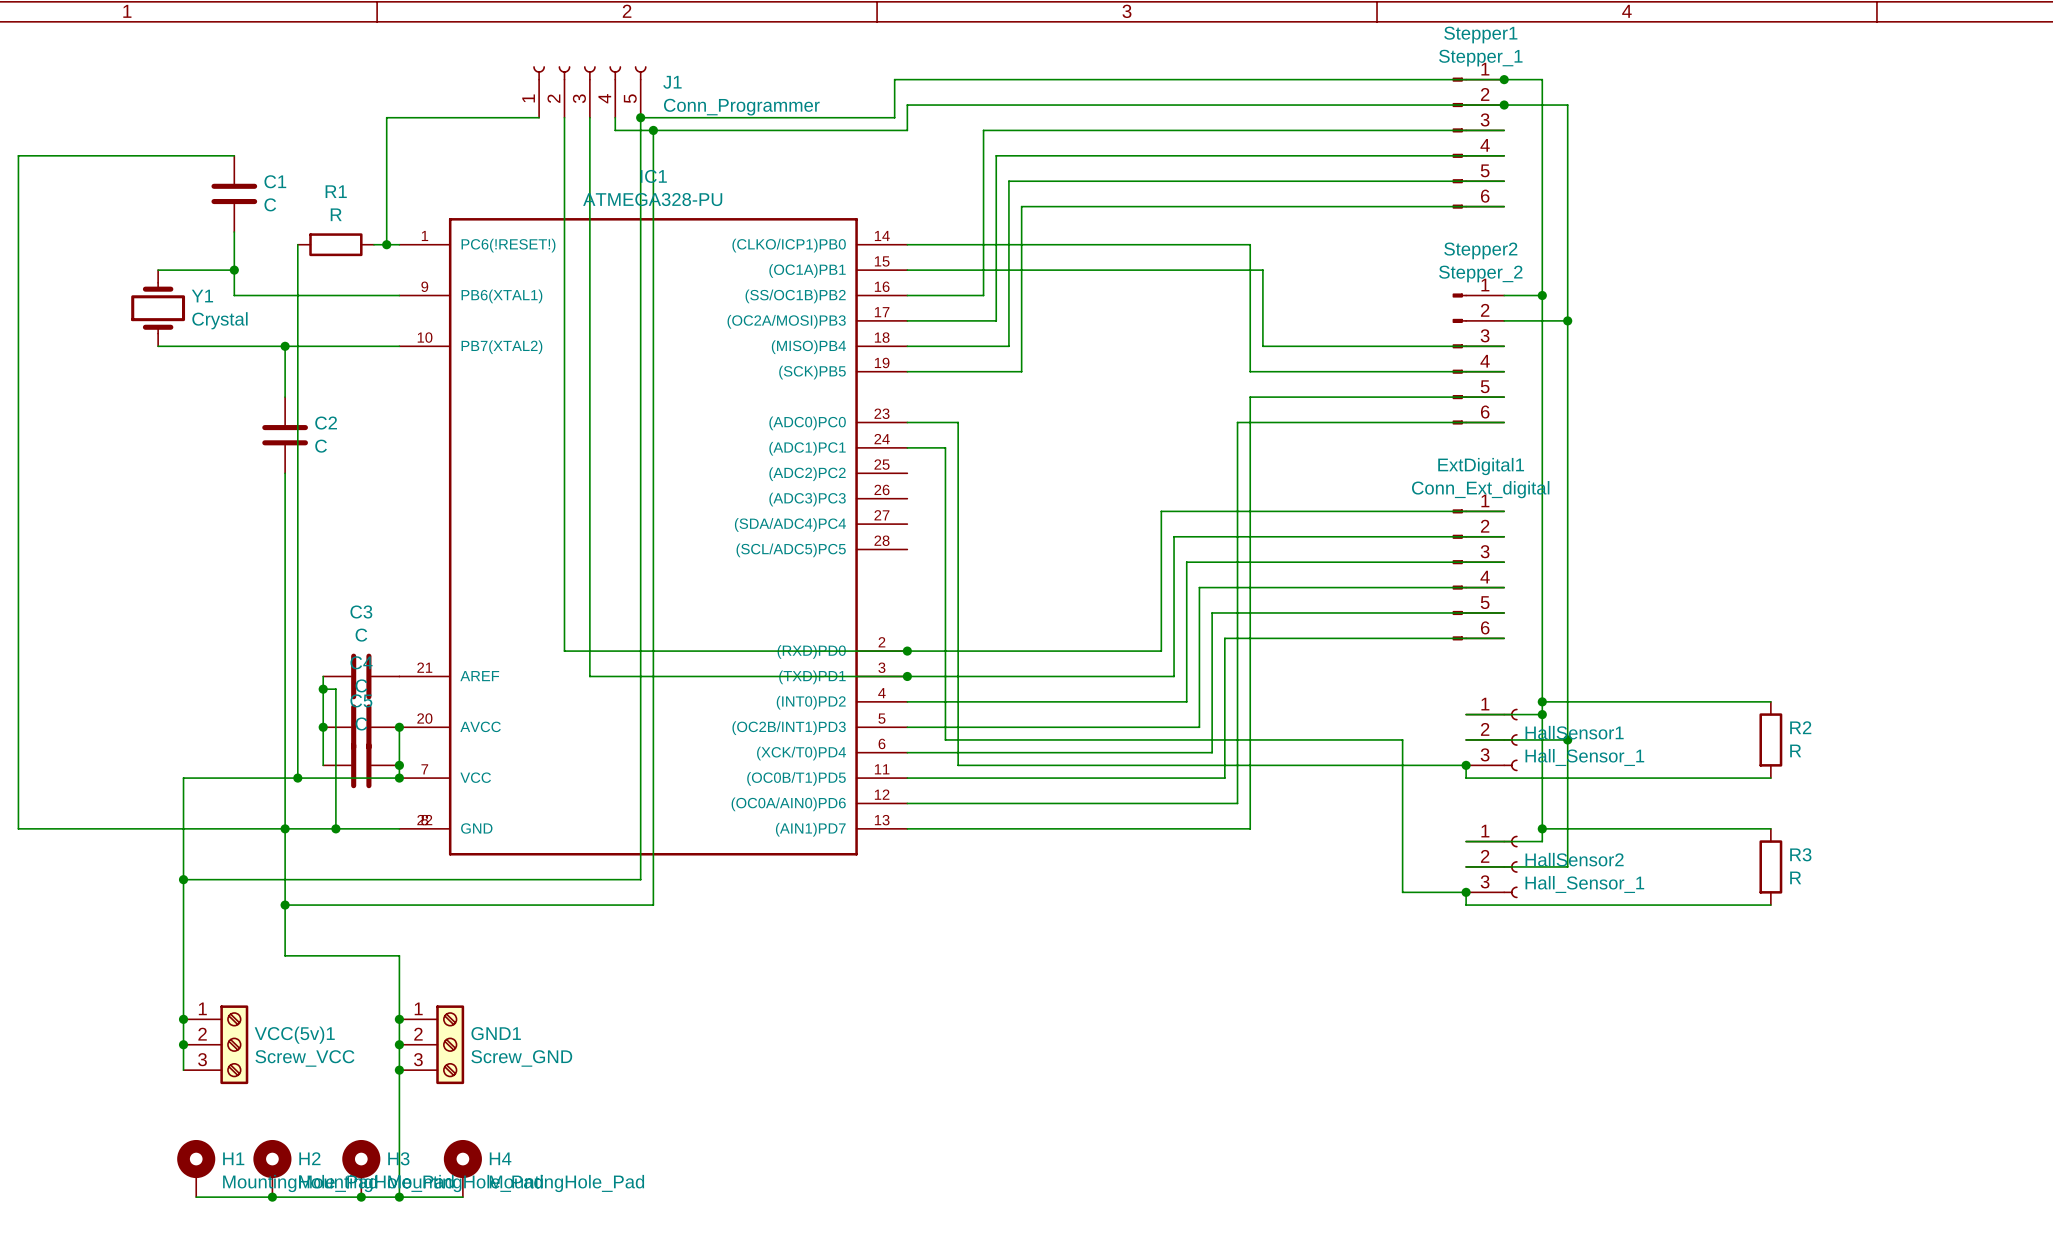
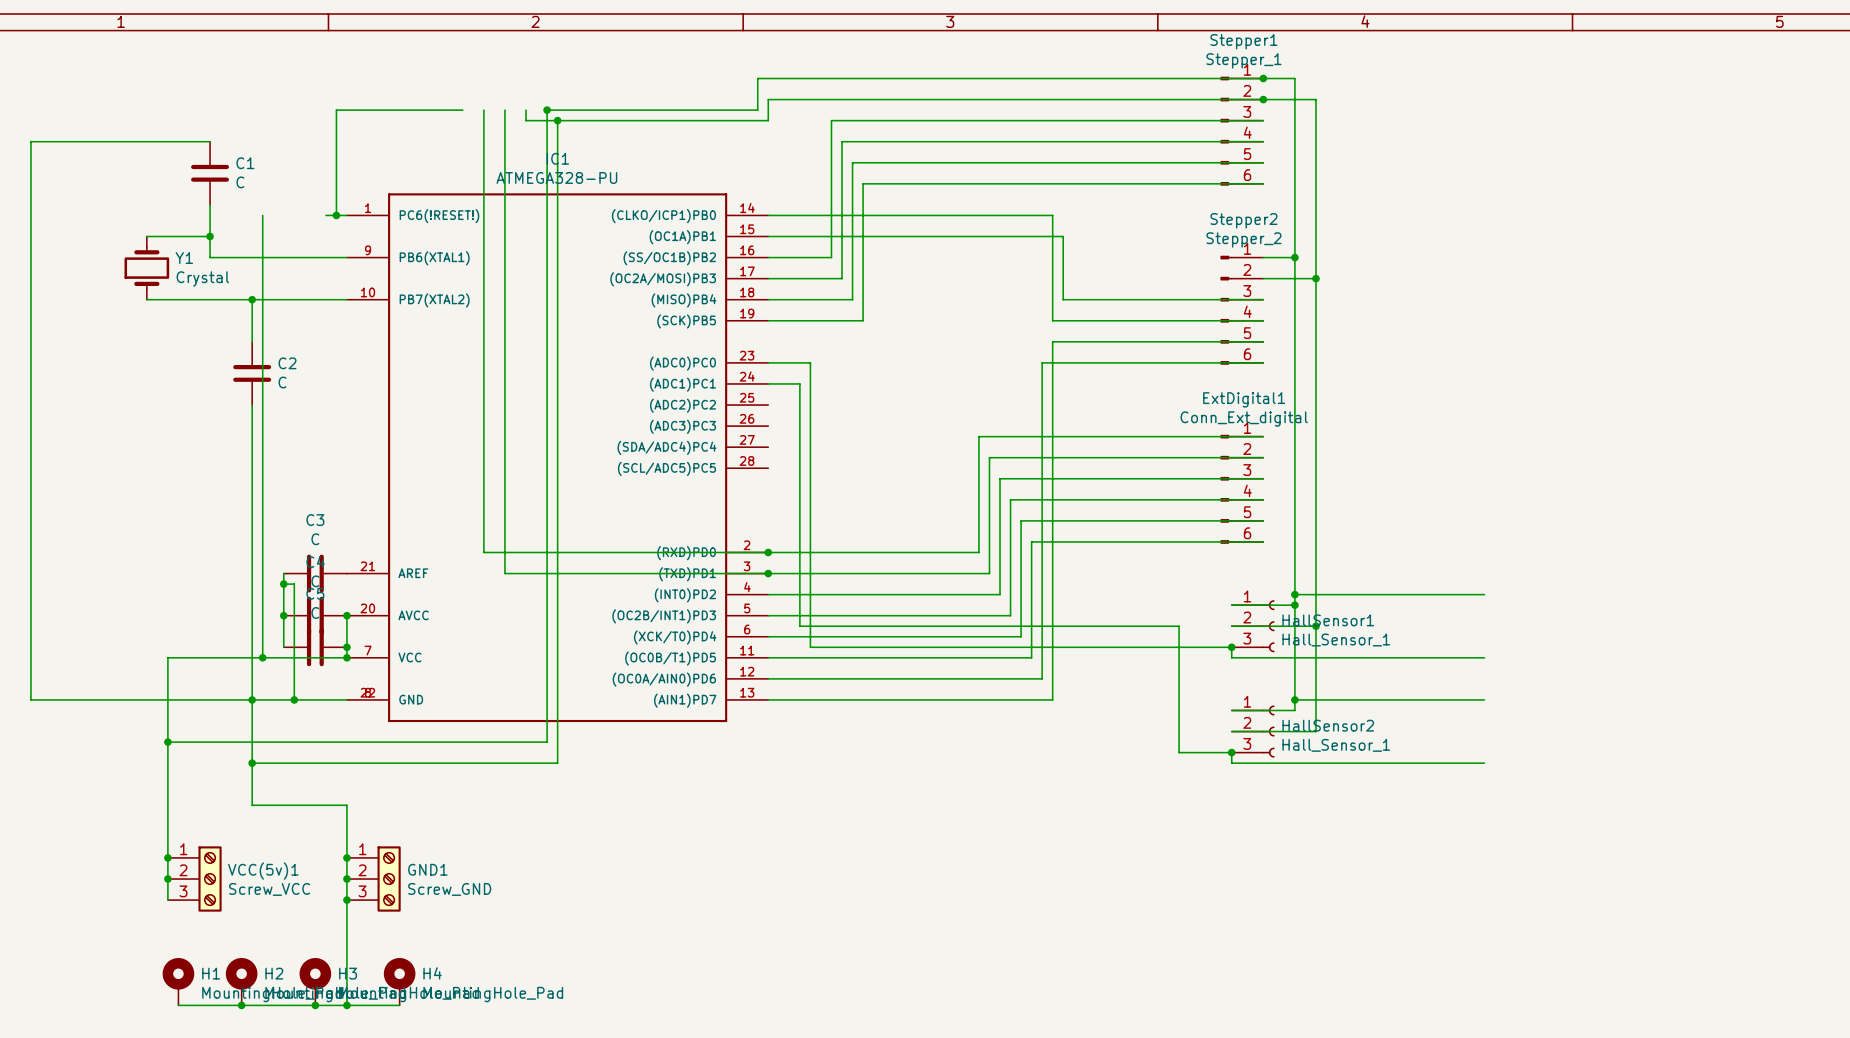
J1: Conn_Programmer (589, 91) -> none
R1: R (335, 244) -> none
R2: R (1770, 739) -> none
R3: R (1770, 866) -> none

